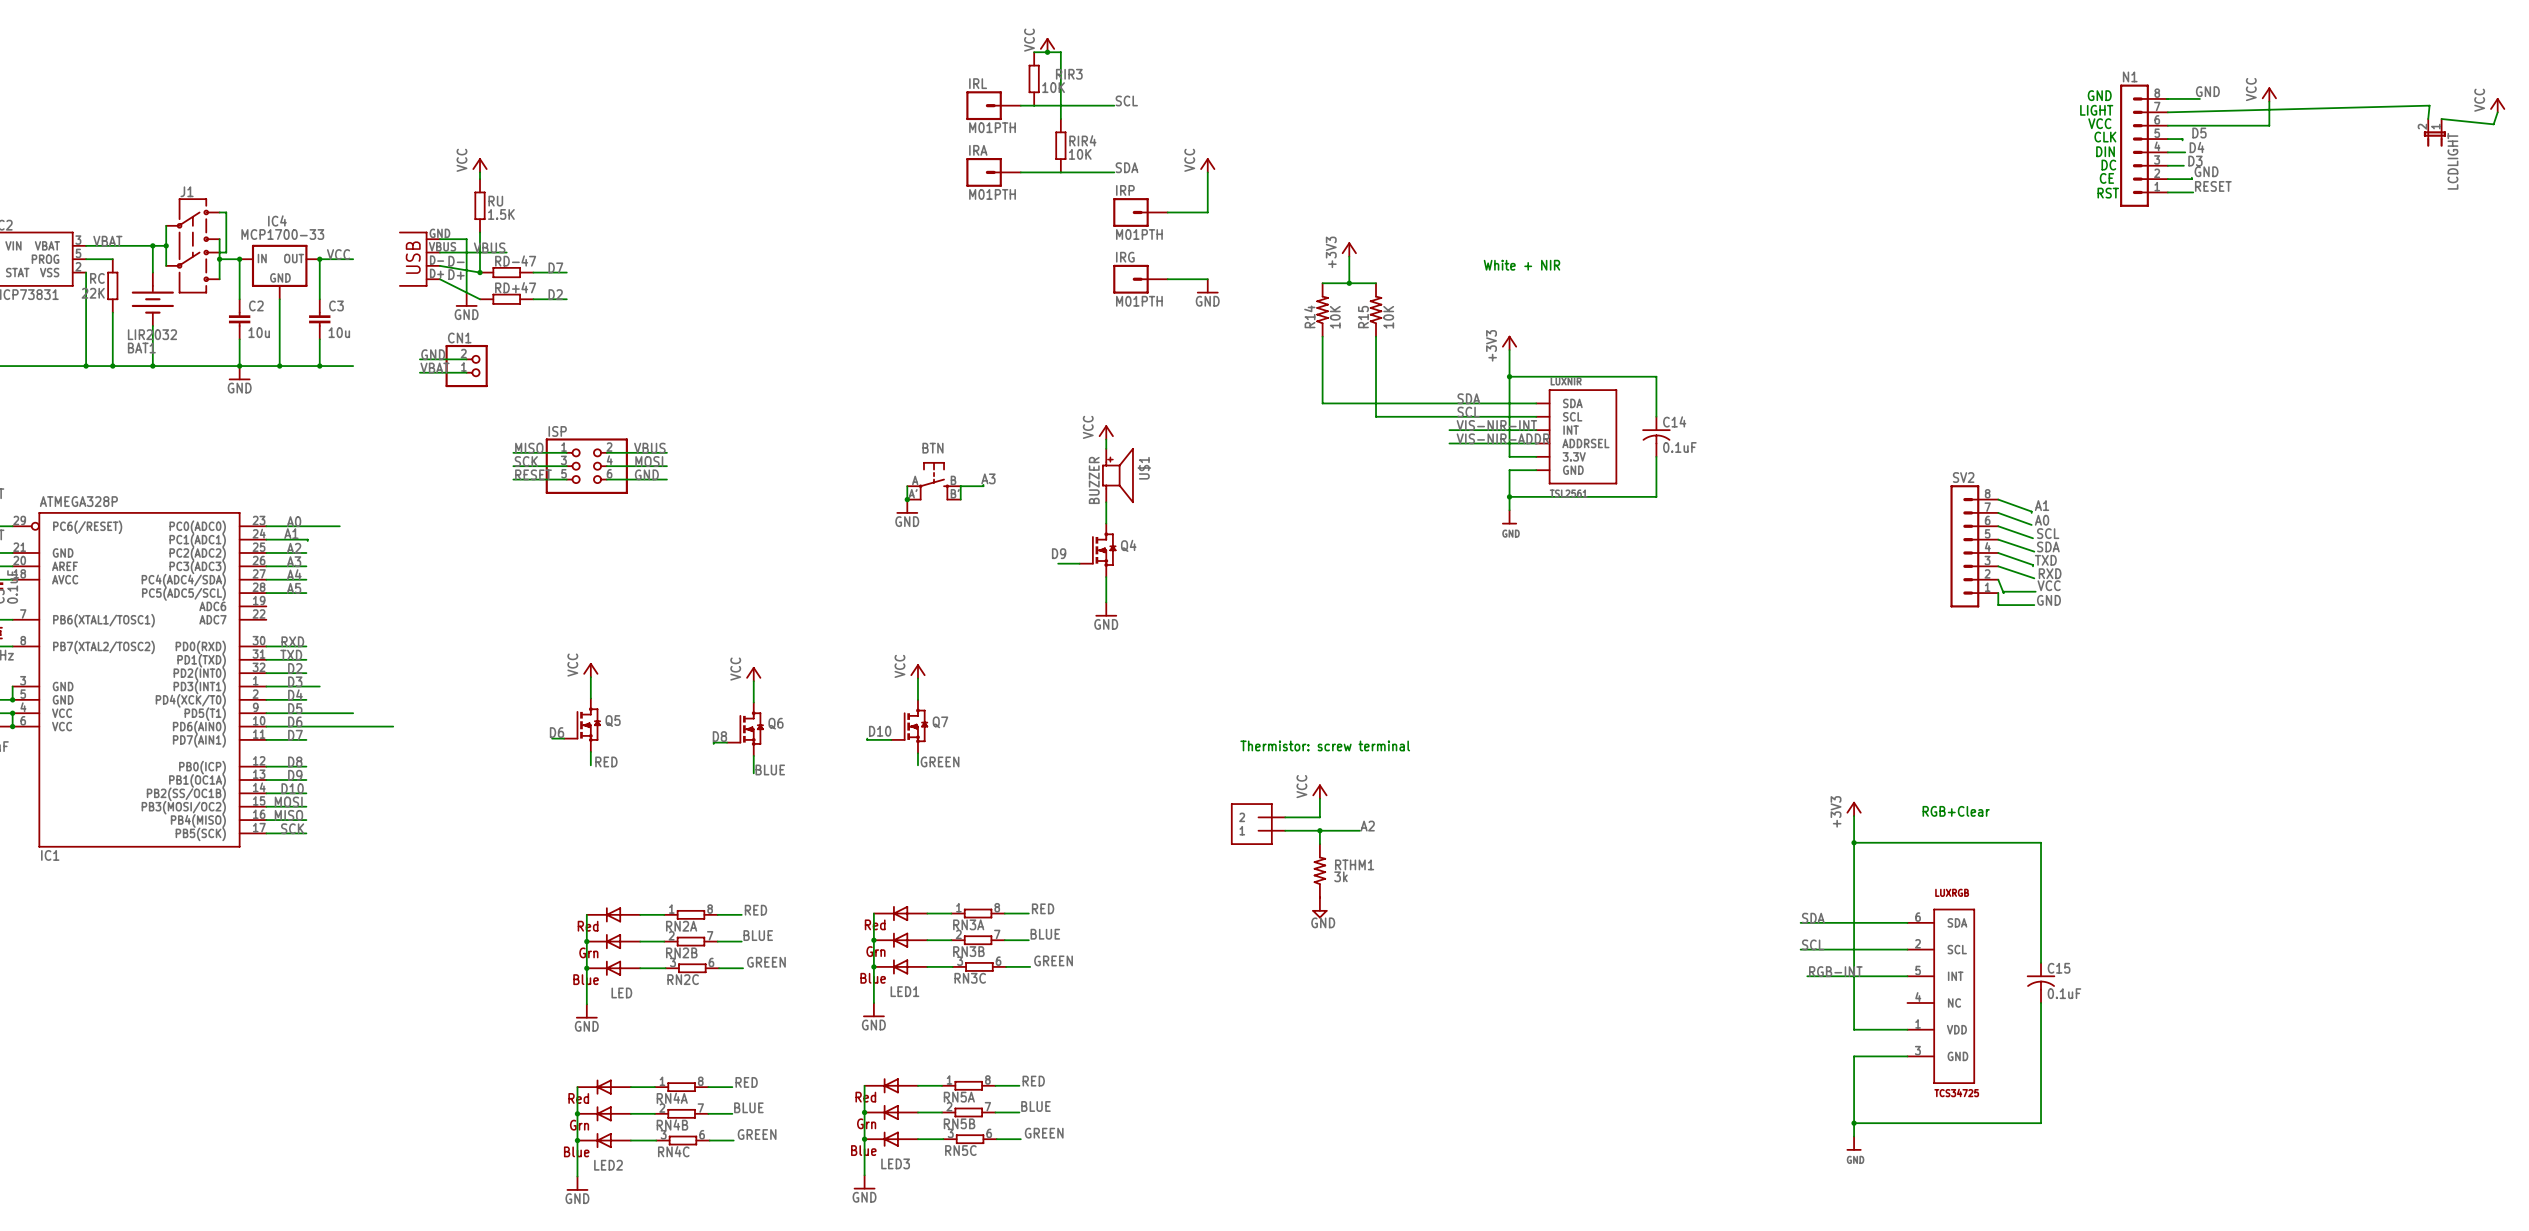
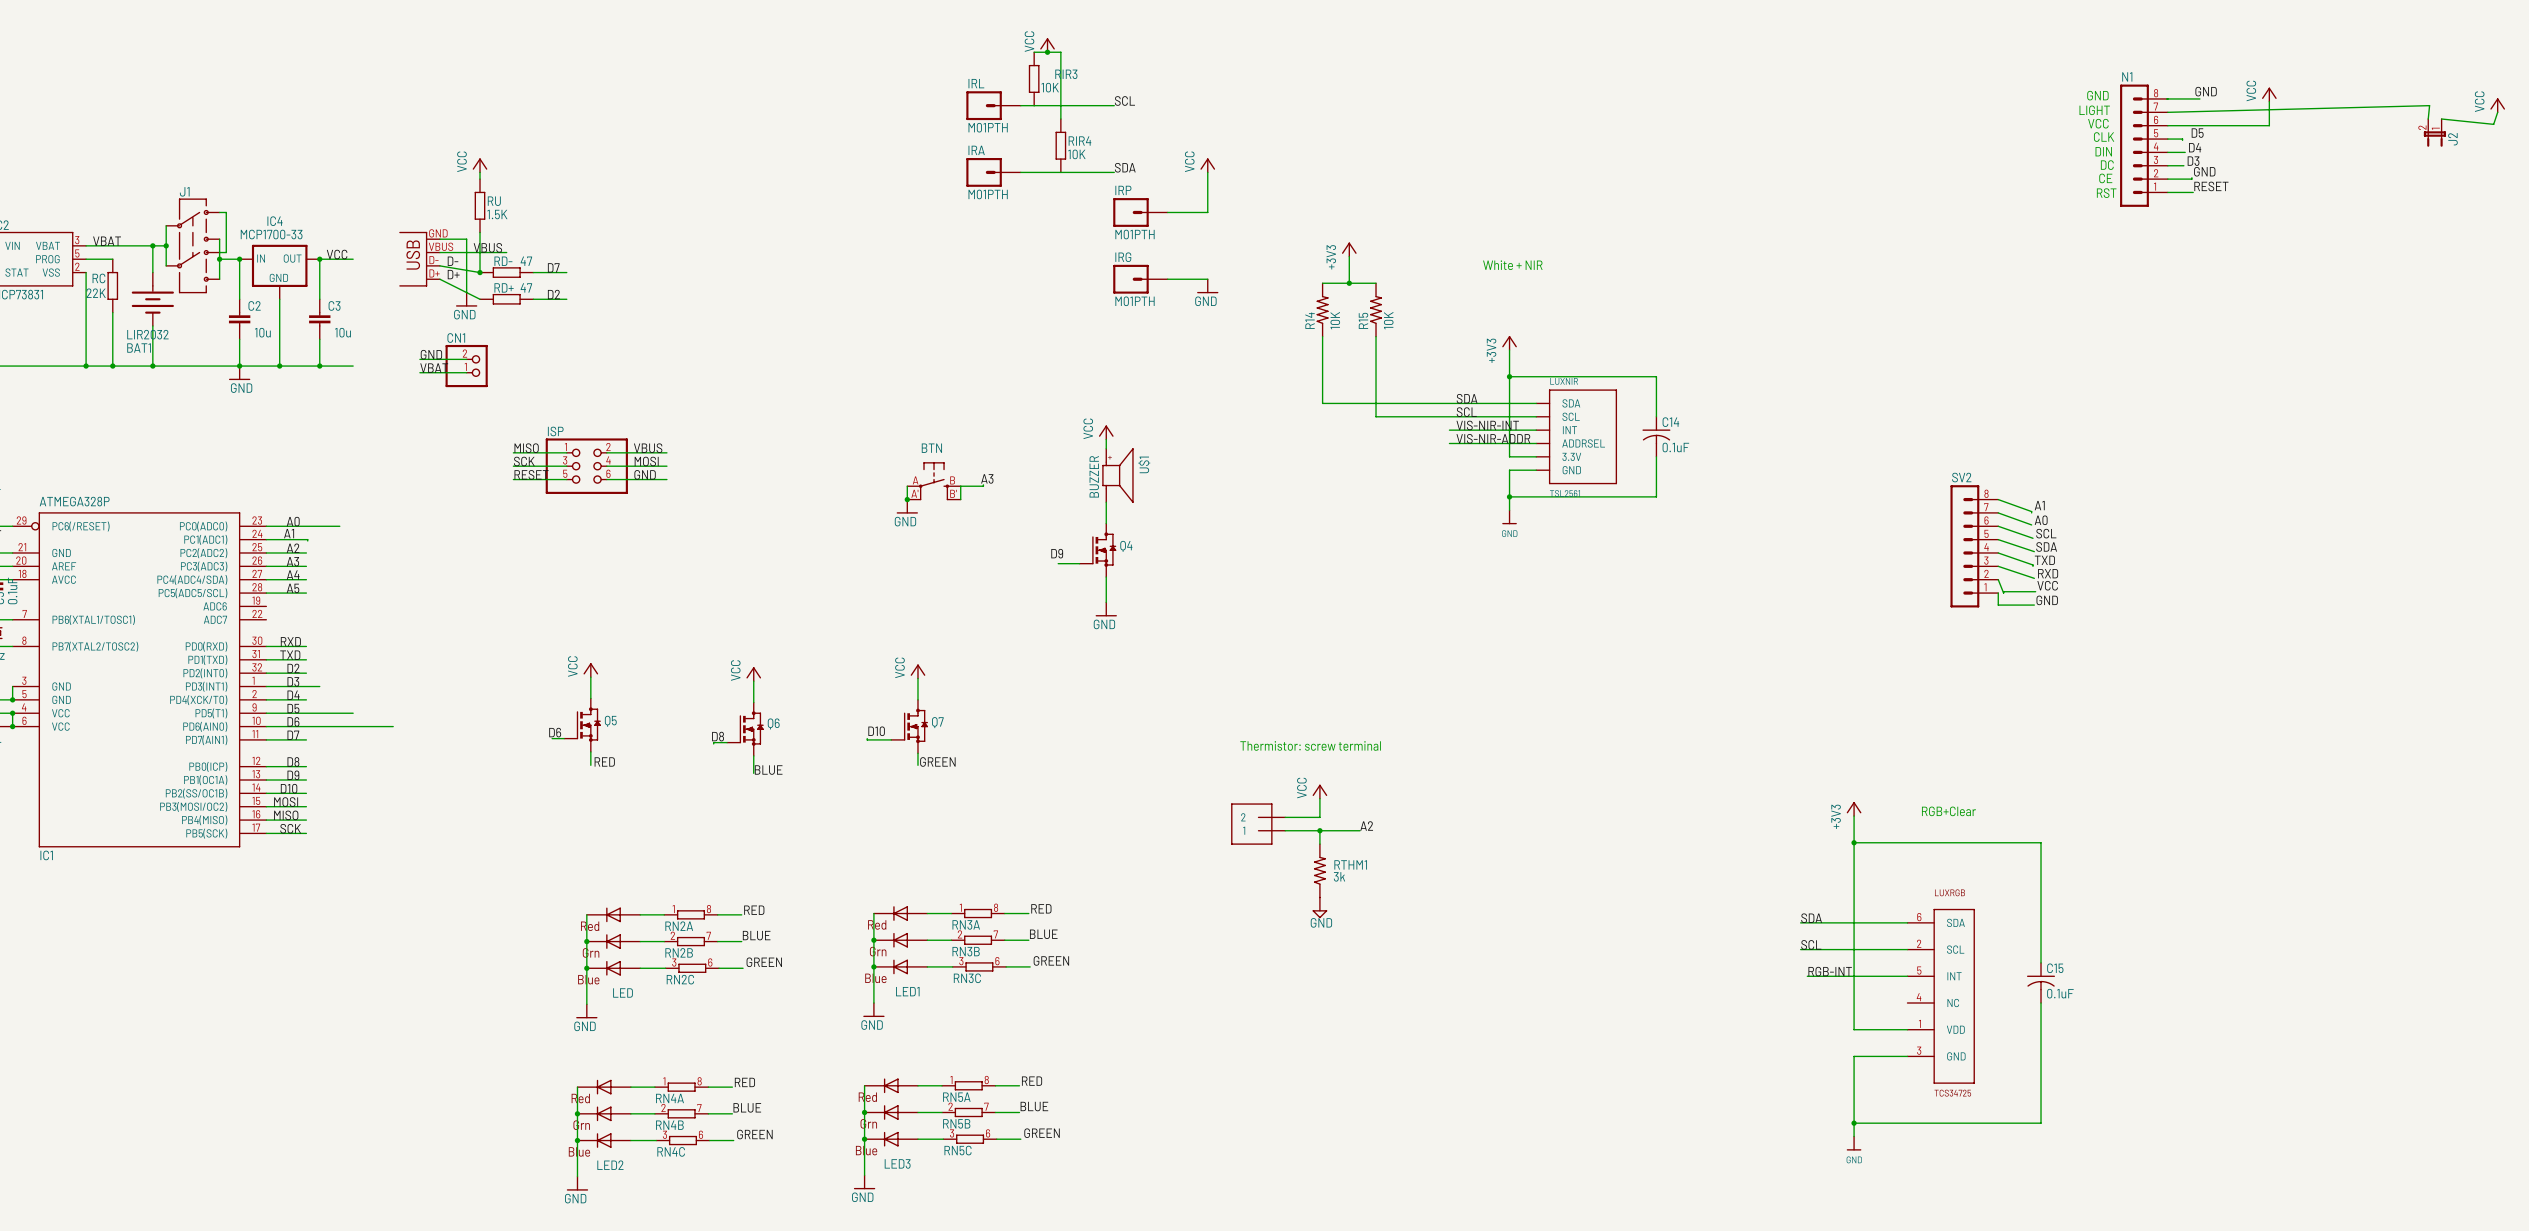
LCDLIGHT name: LCDLIGHT (2452, 161) -> J2 (2452, 139)

